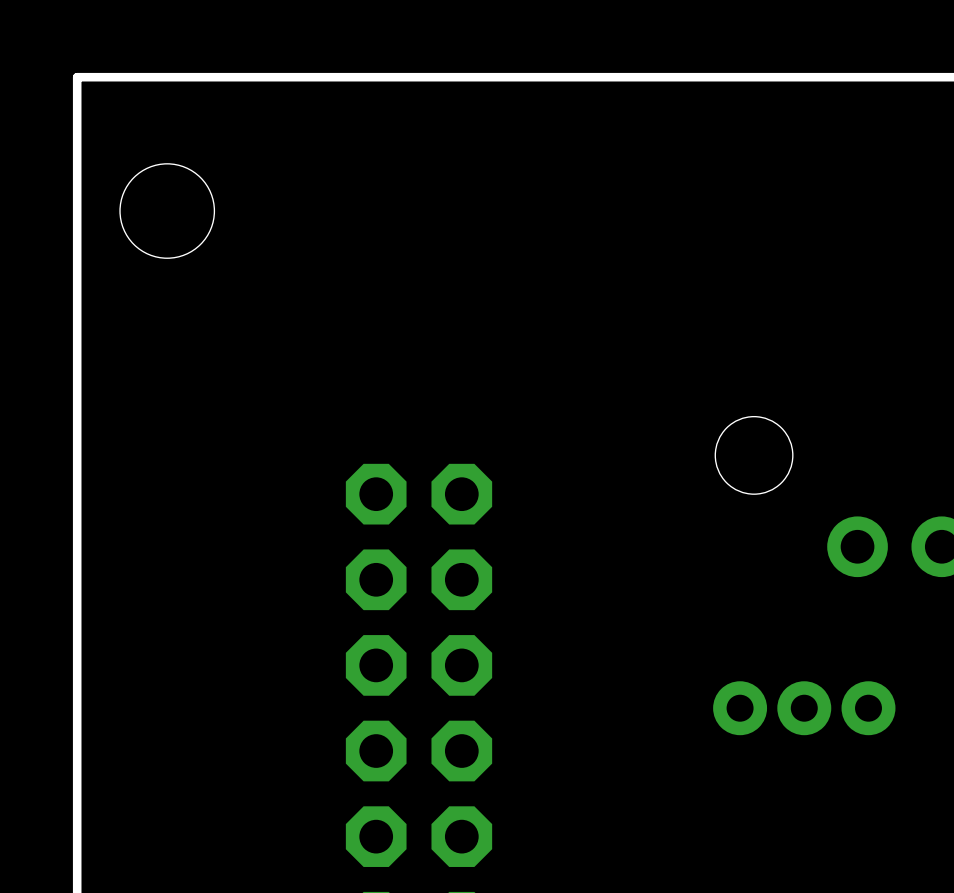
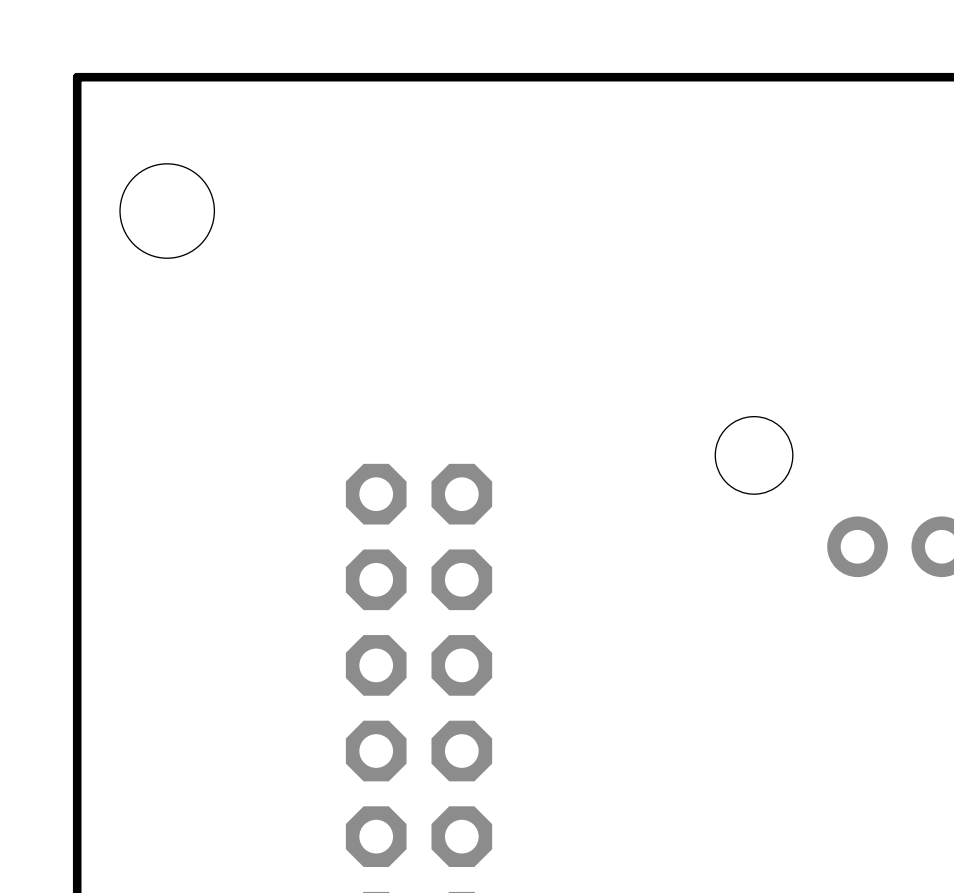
part: (804, 708) -> none

